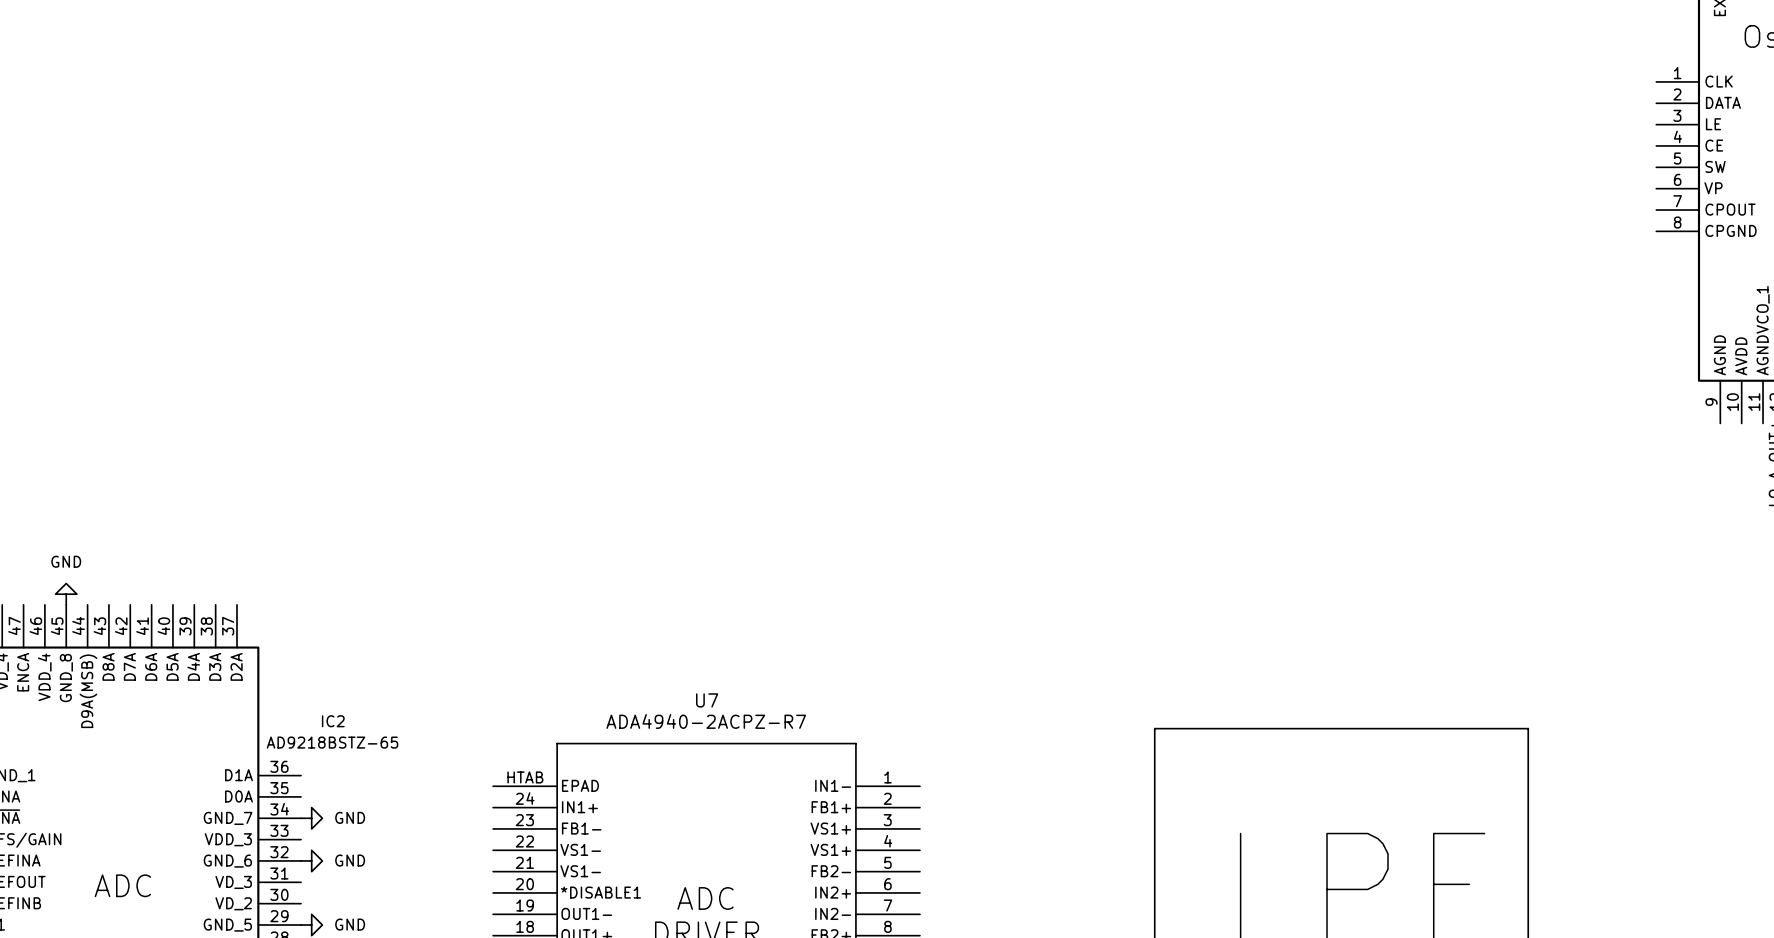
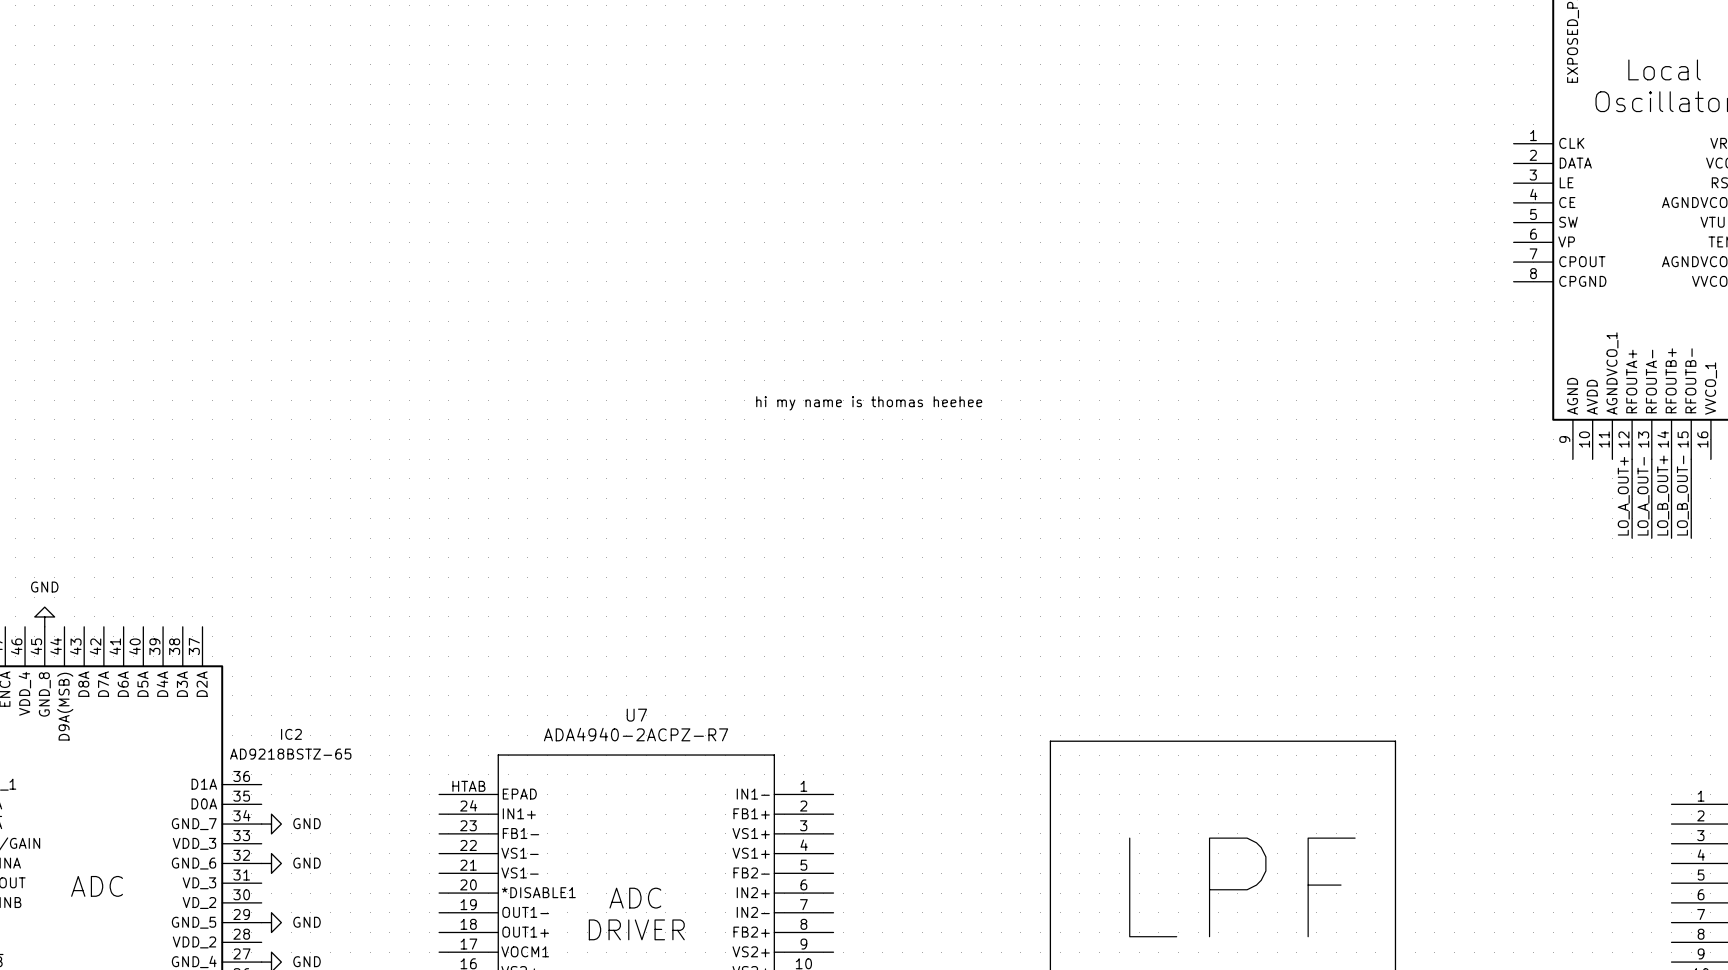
text: none -> hi my name is thomas heehee (869, 403)

